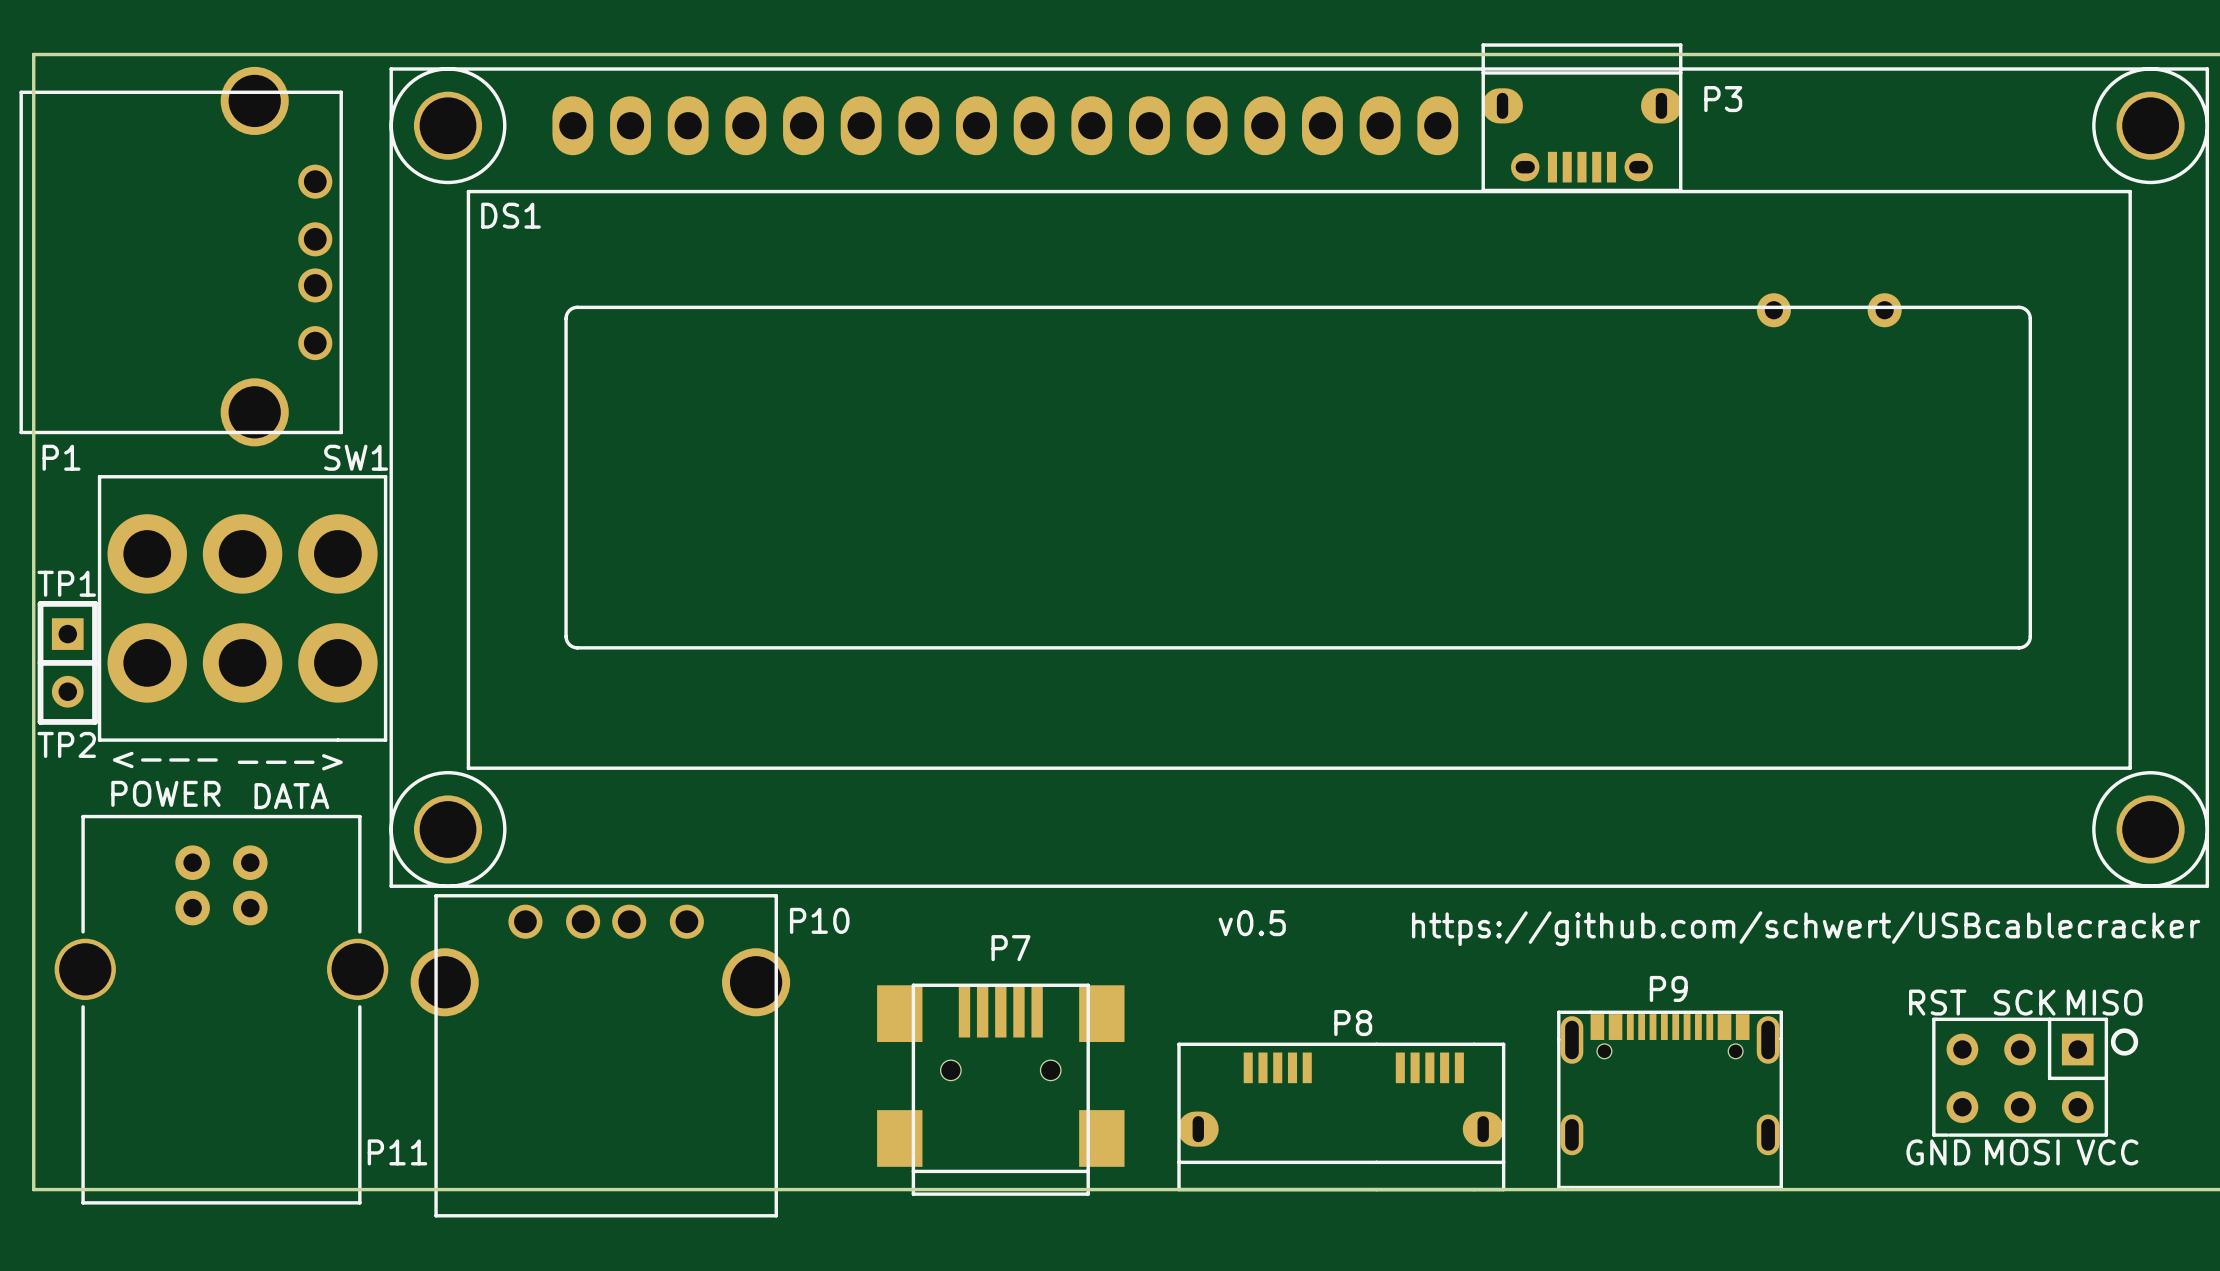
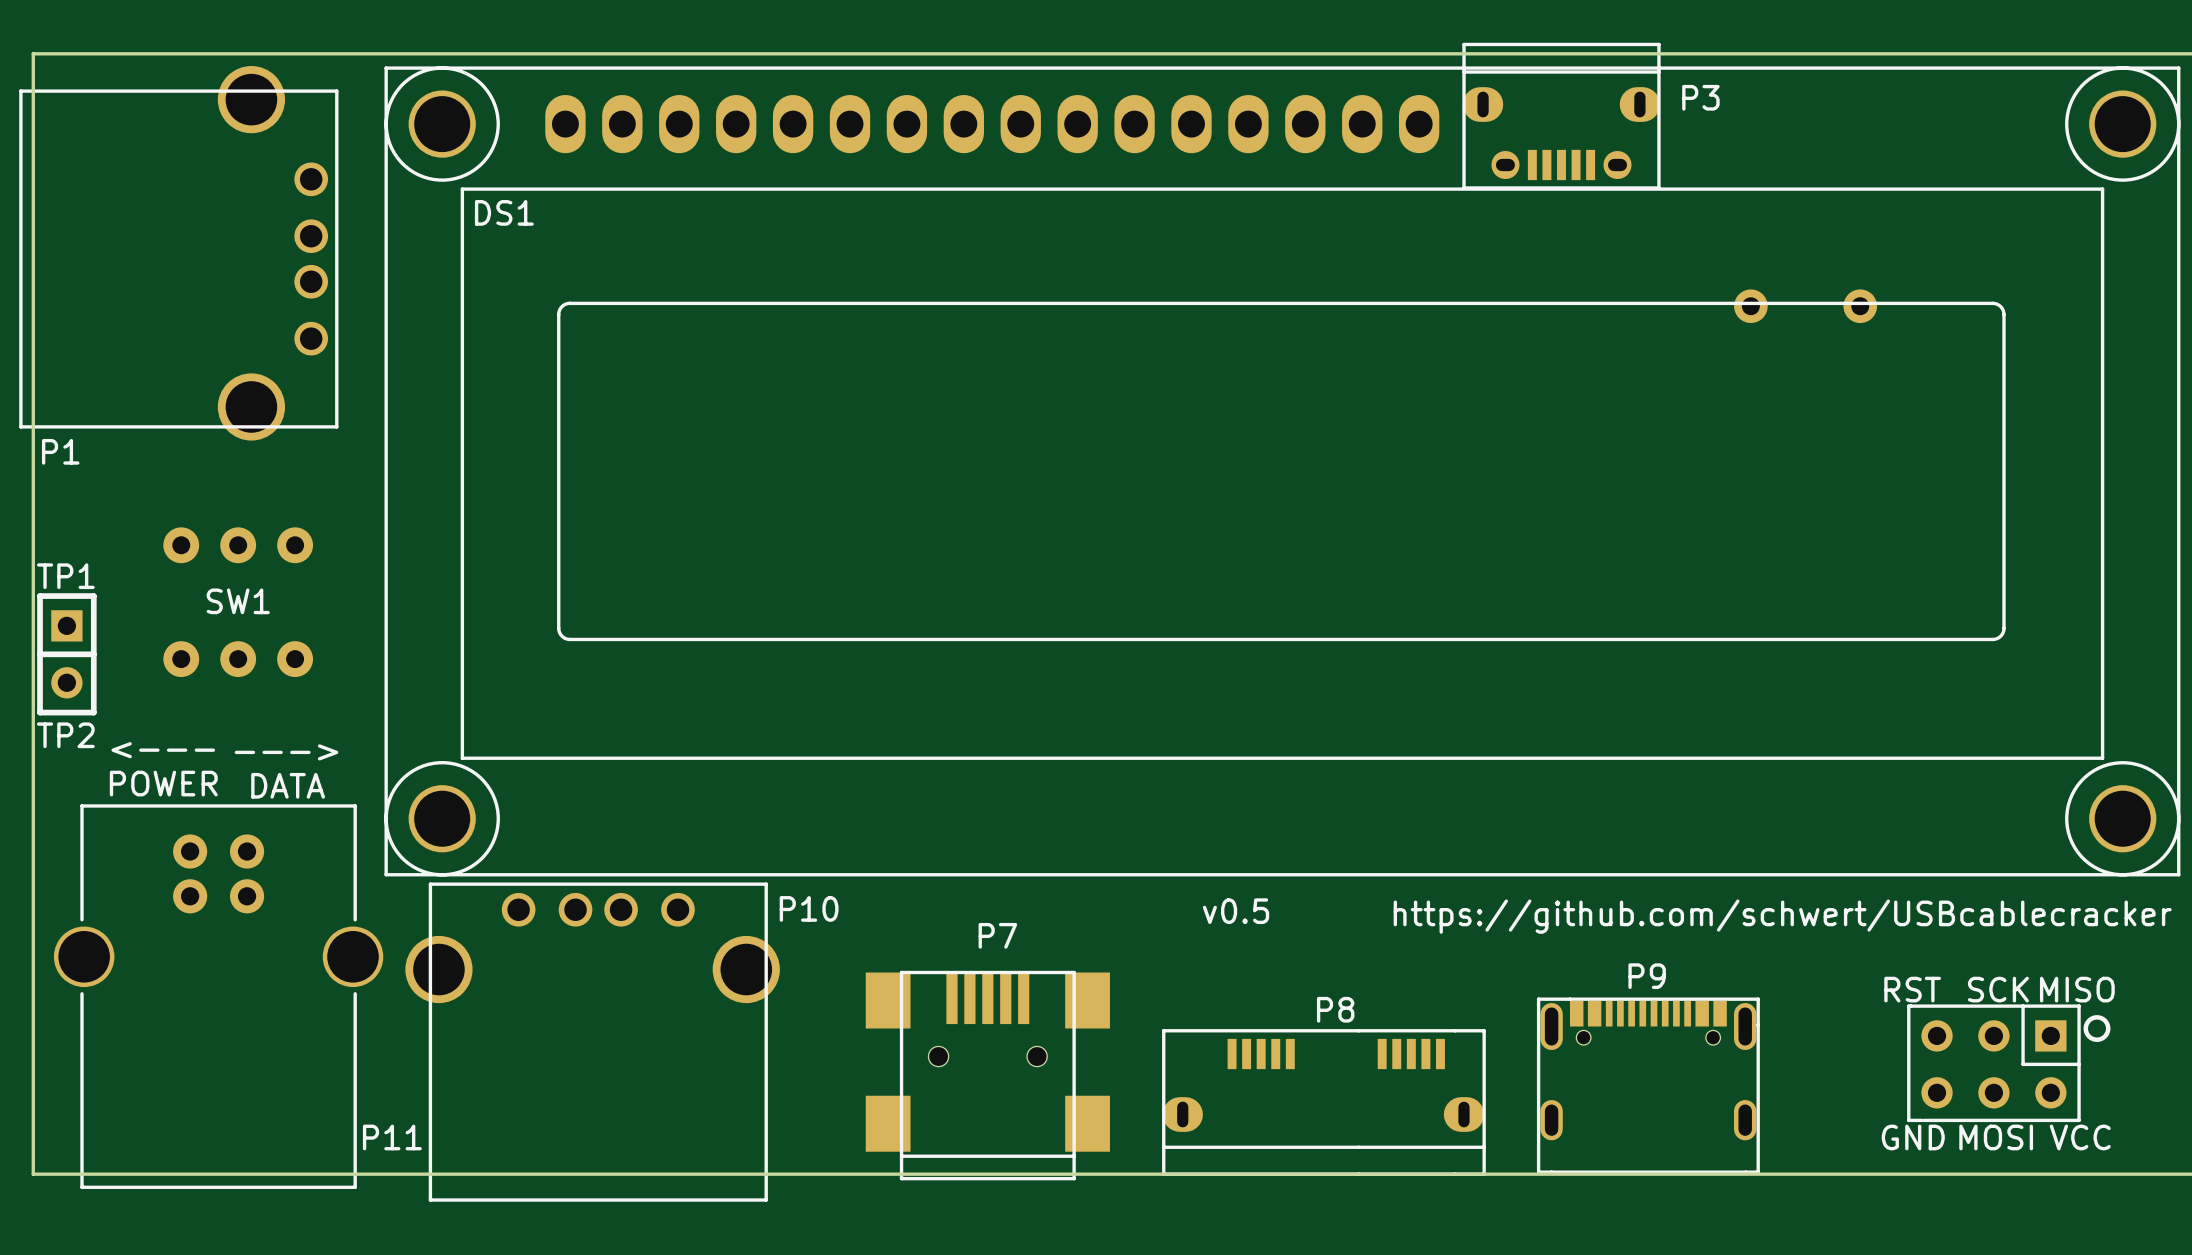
SW1 name position: SW1 (356, 457) -> SW1 (238, 601)
SW1 footprint: [97, 475, 388, 742] -> [163, 527, 314, 678]

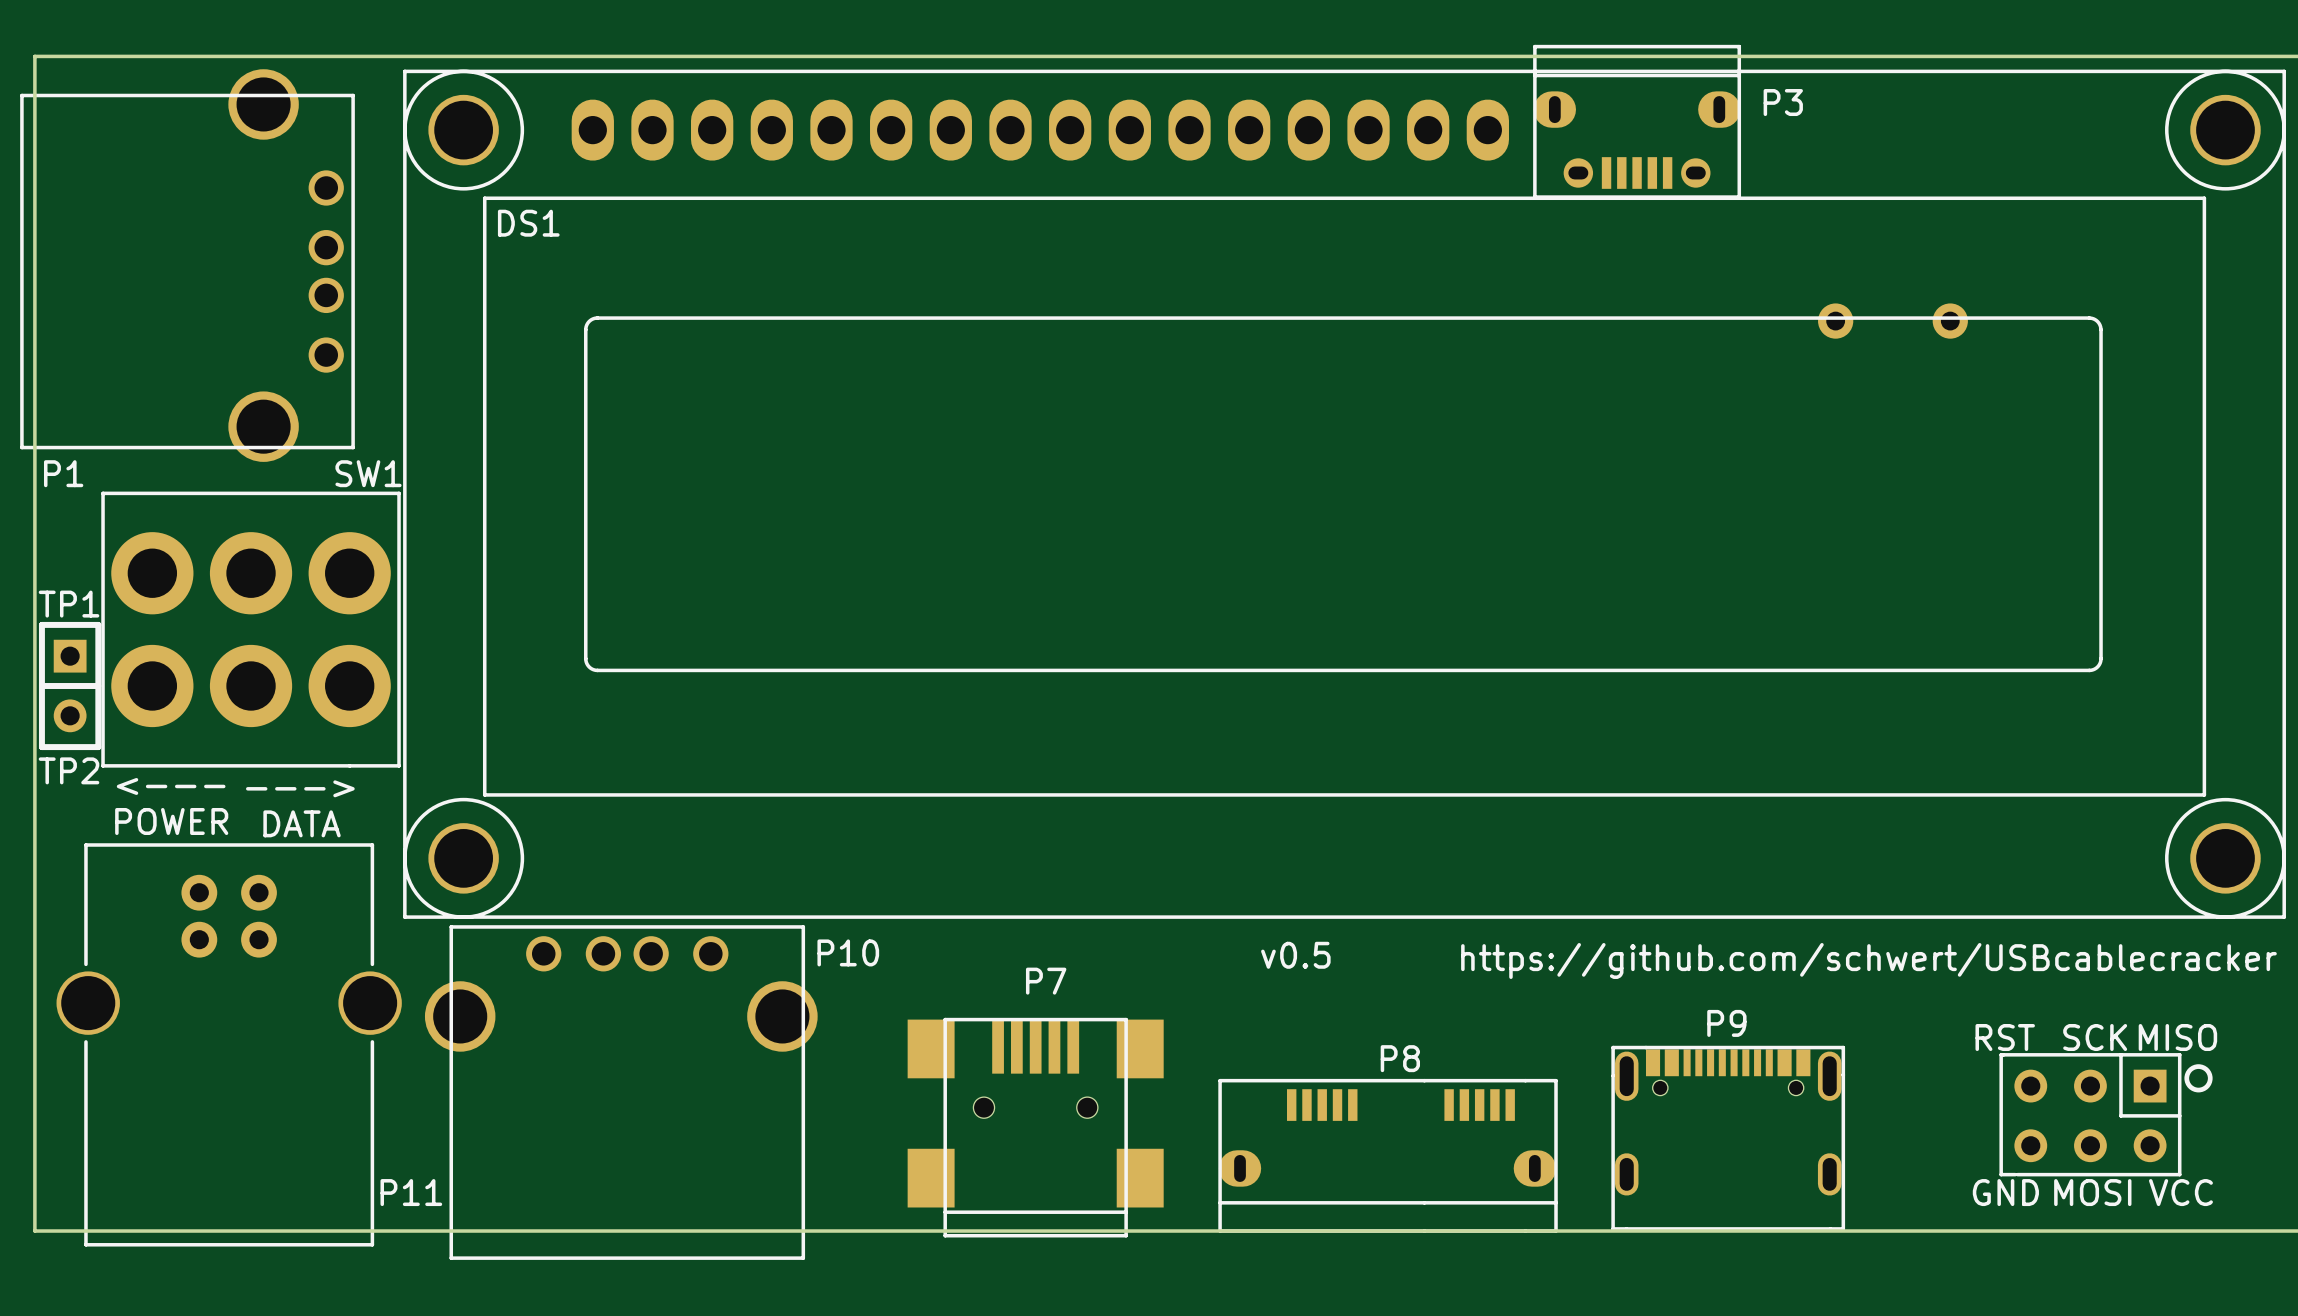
SW1 footprint: [163, 527, 314, 678] -> [101, 491, 401, 768]
SW1 name position: SW1 (238, 601) -> SW1 (368, 473)

